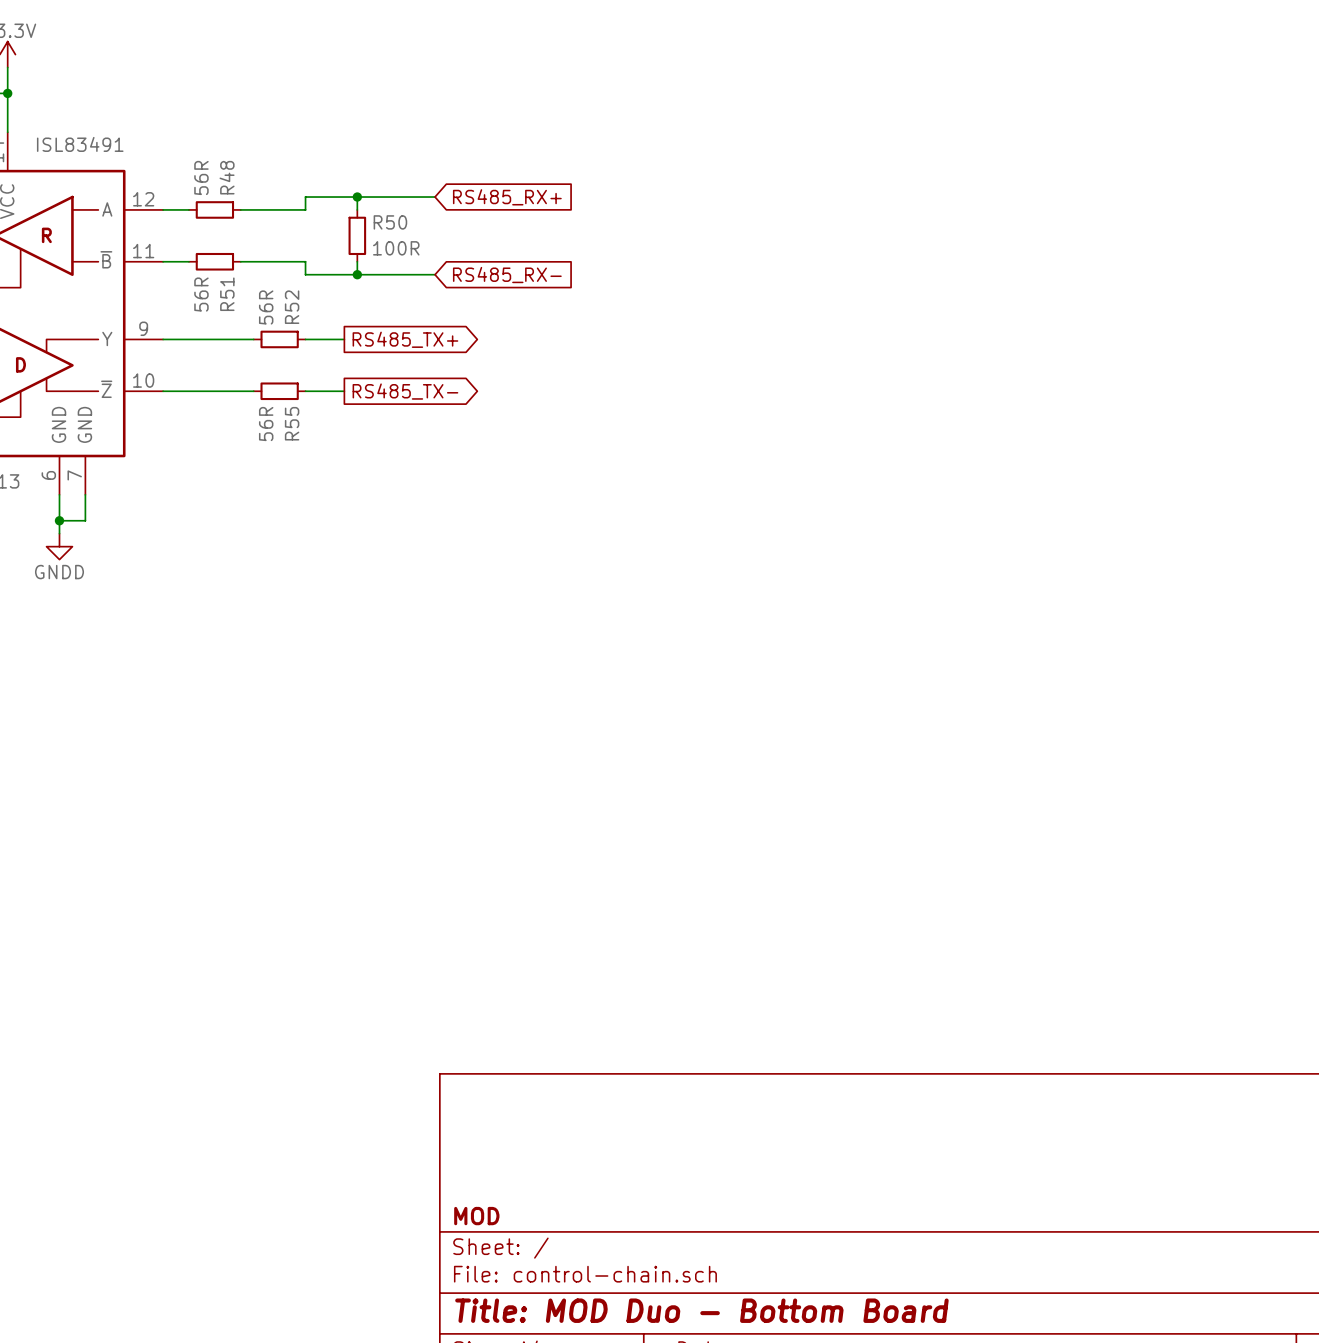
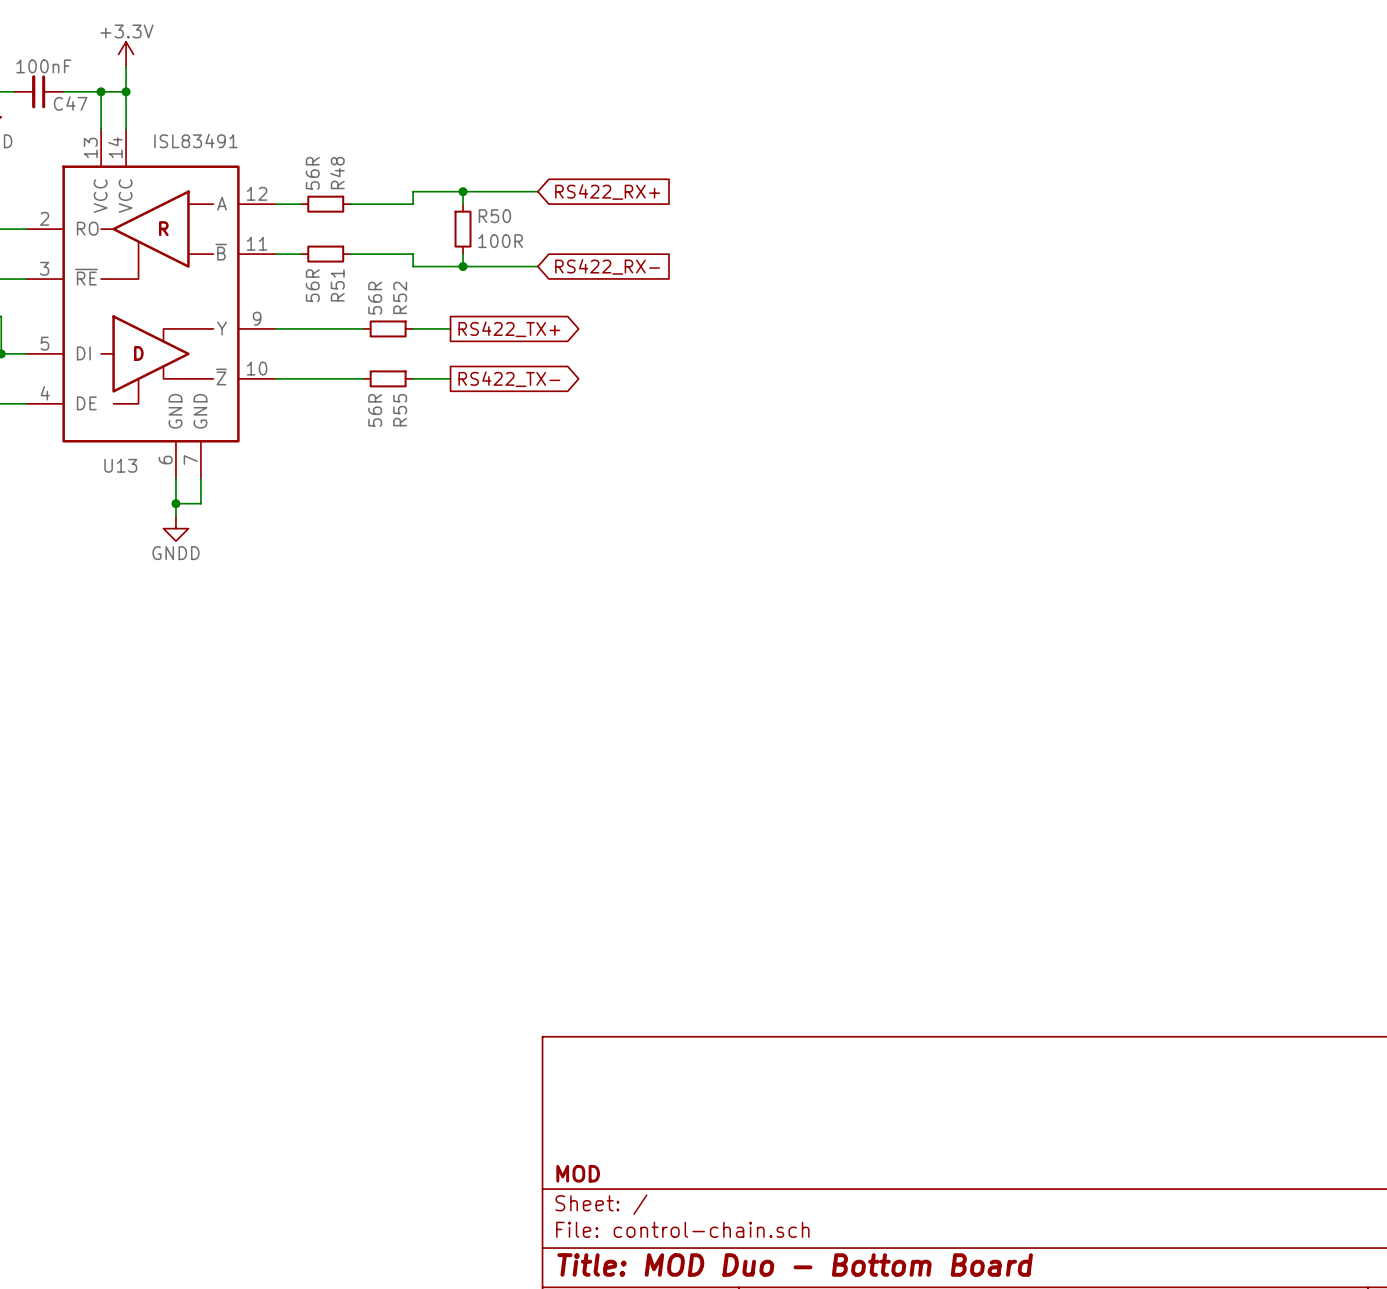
global label: RS485_RX+ (507, 197) -> RS422_RX+ (607, 191)
global label: RS485_RX- (507, 275) -> RS422_RX- (607, 266)
global label: RS485_TX+ (405, 339) -> RS422_TX+ (509, 329)
global label: RS485_TX- (405, 391) -> RS422_TX- (509, 379)

